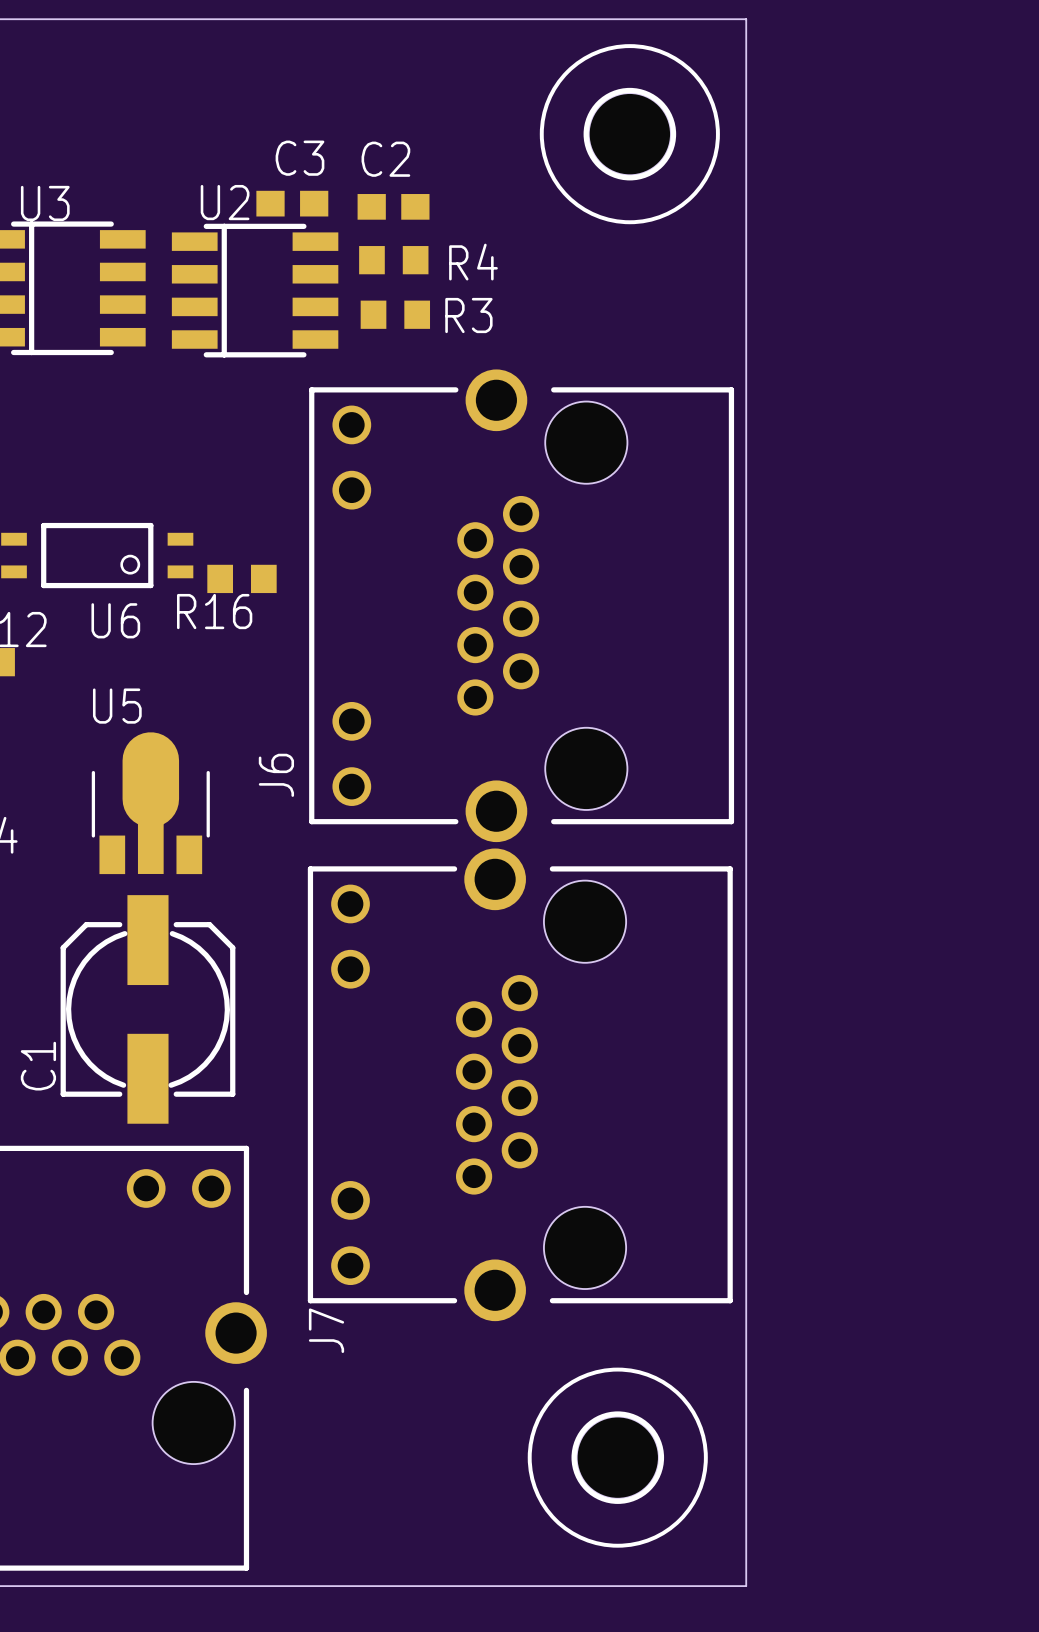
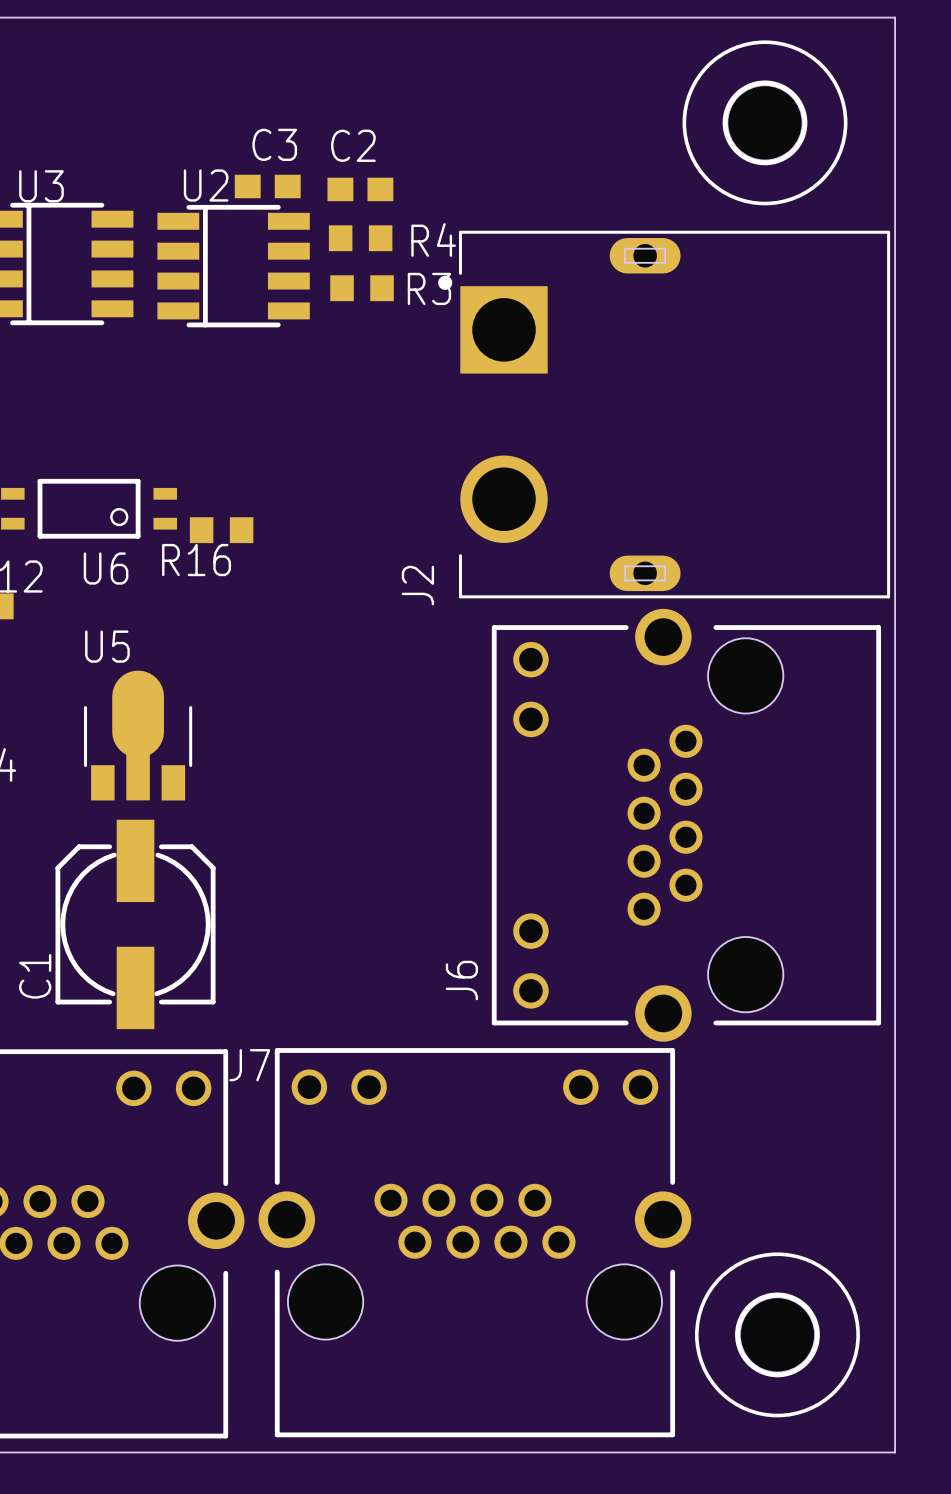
board edge: (746, 19) (746, 1586) -> (683, 17) (895, 17) (895, 1452) (683, 1452)
part position: (629, 134) -> (764, 122)
J2: none -> (664, 414)
J6 position: (521, 605) -> (686, 825)
J7 rotation: 0° (520, 1084) -> 90° clockwise (474, 1242)
part position: (617, 1457) -> (777, 1334)

